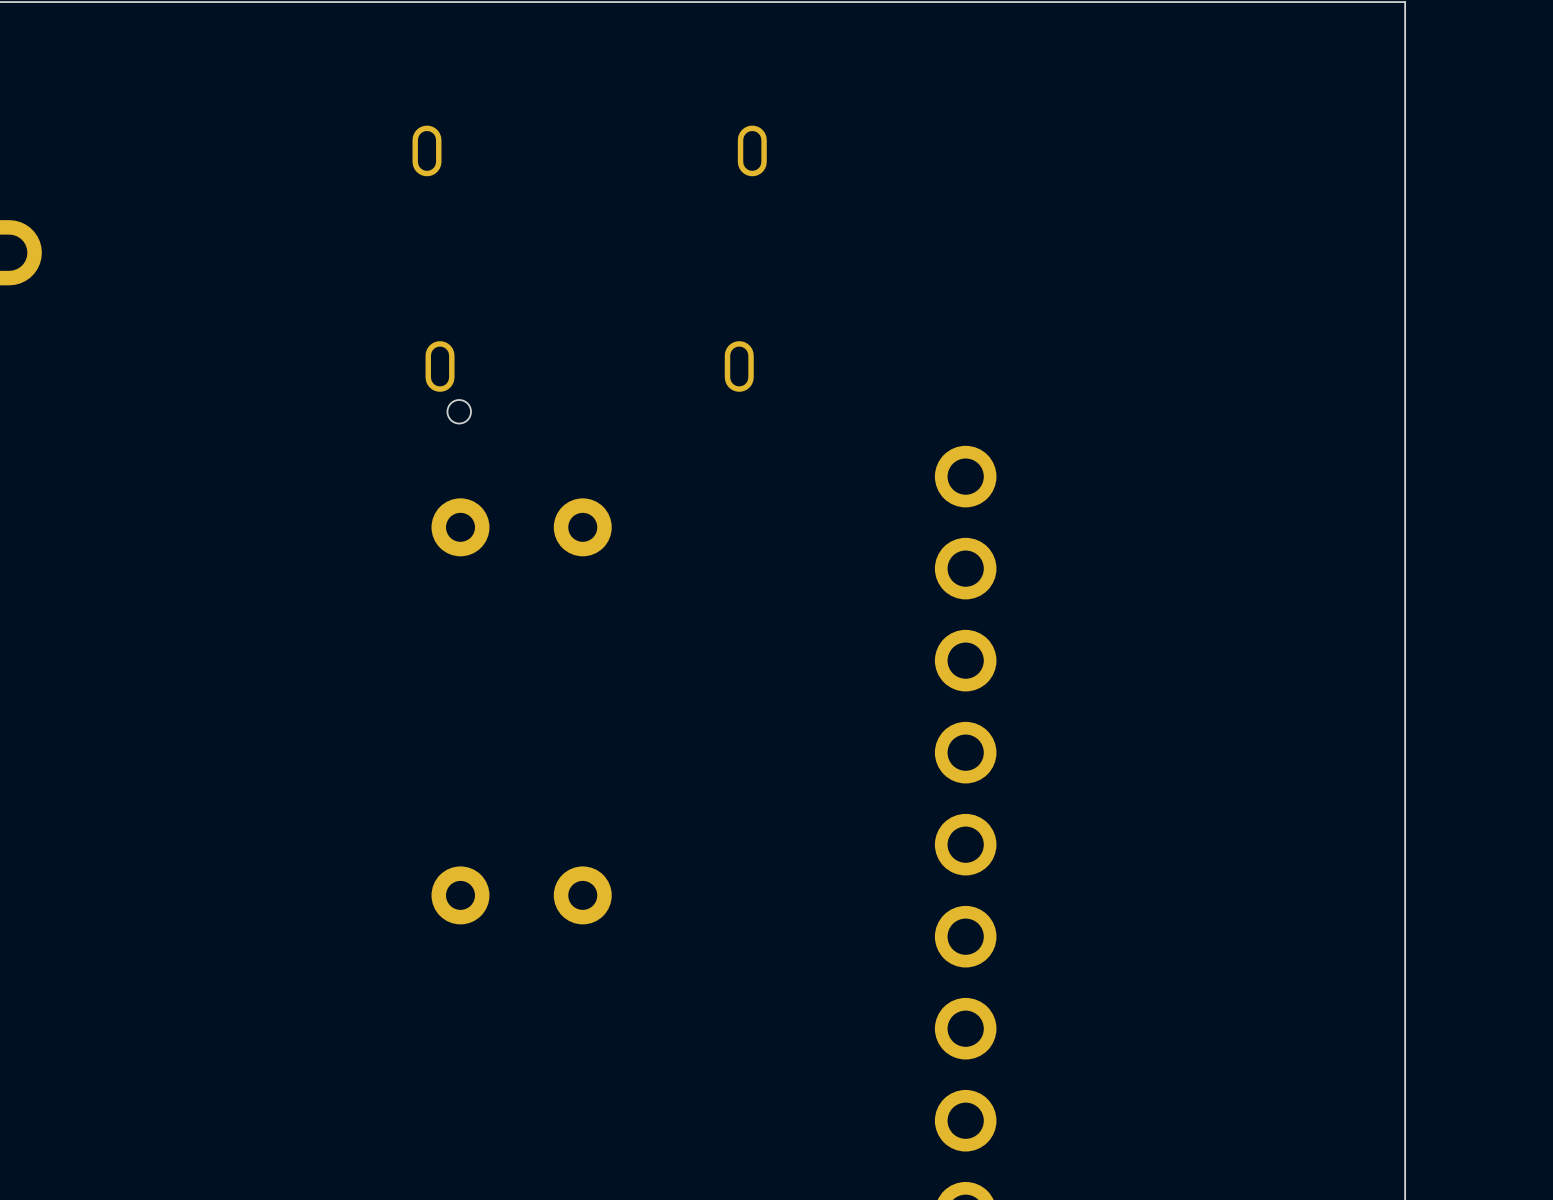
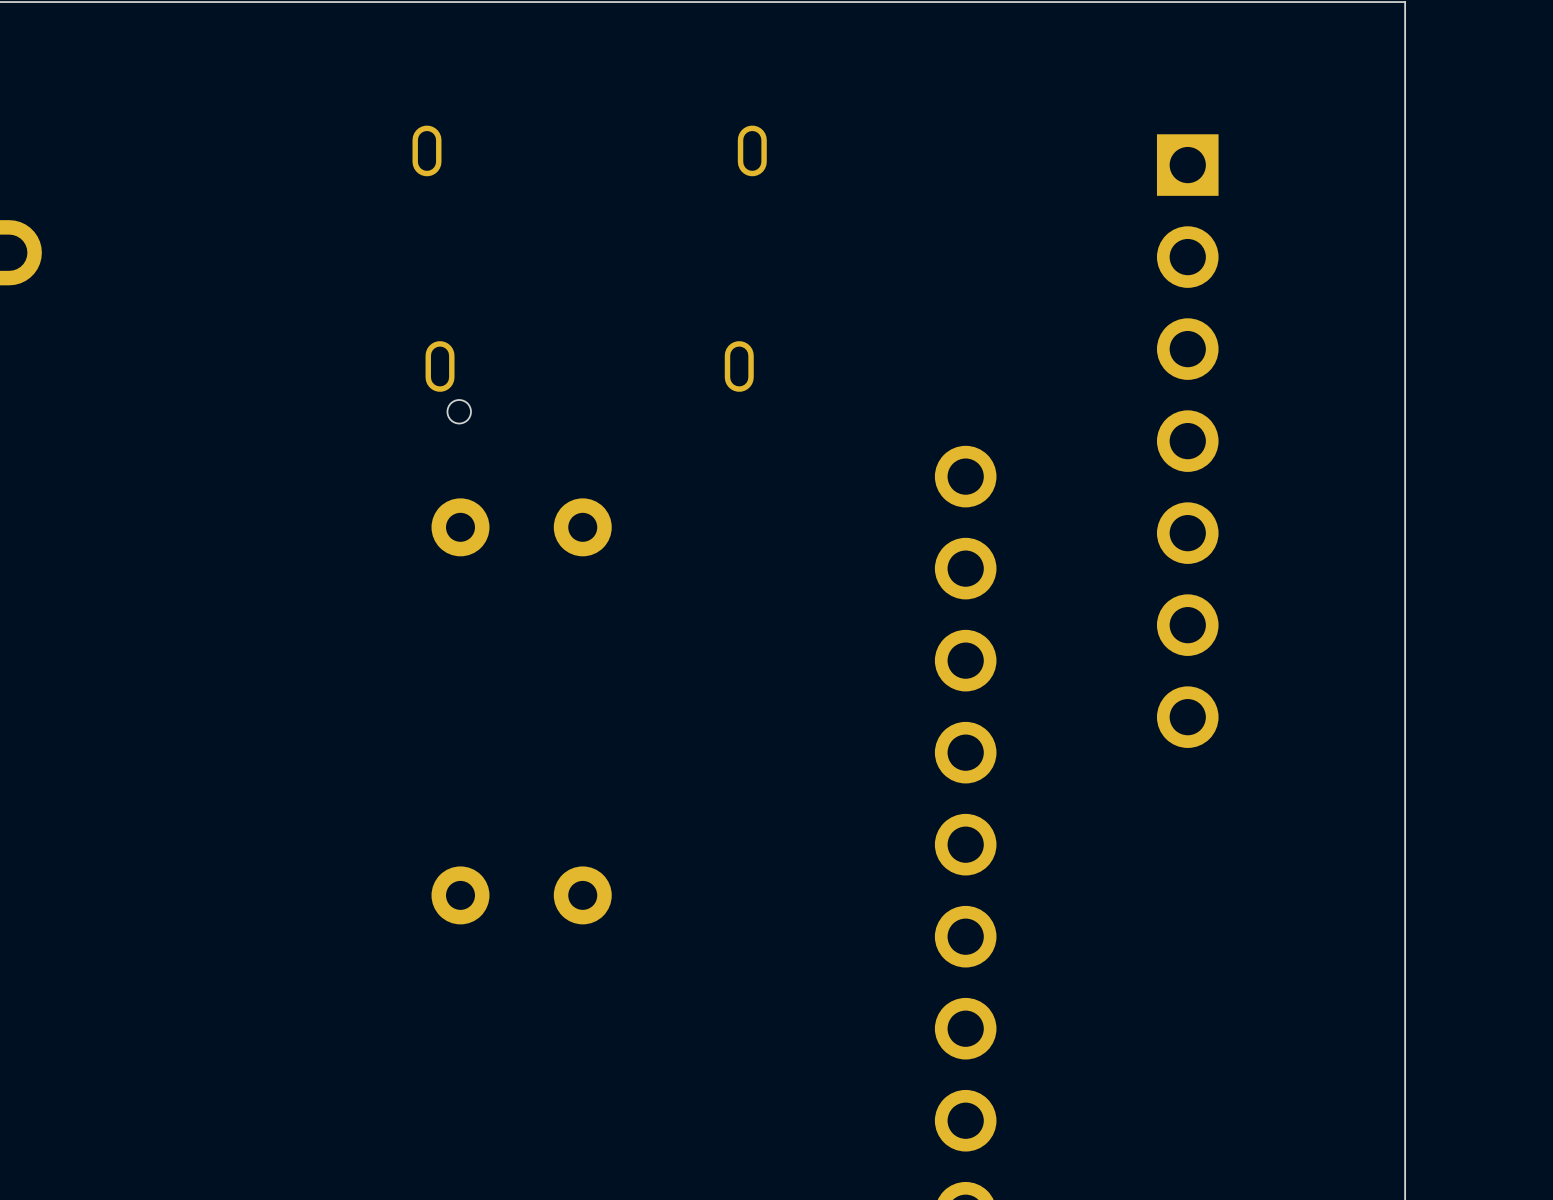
part: none -> (1187, 441)

